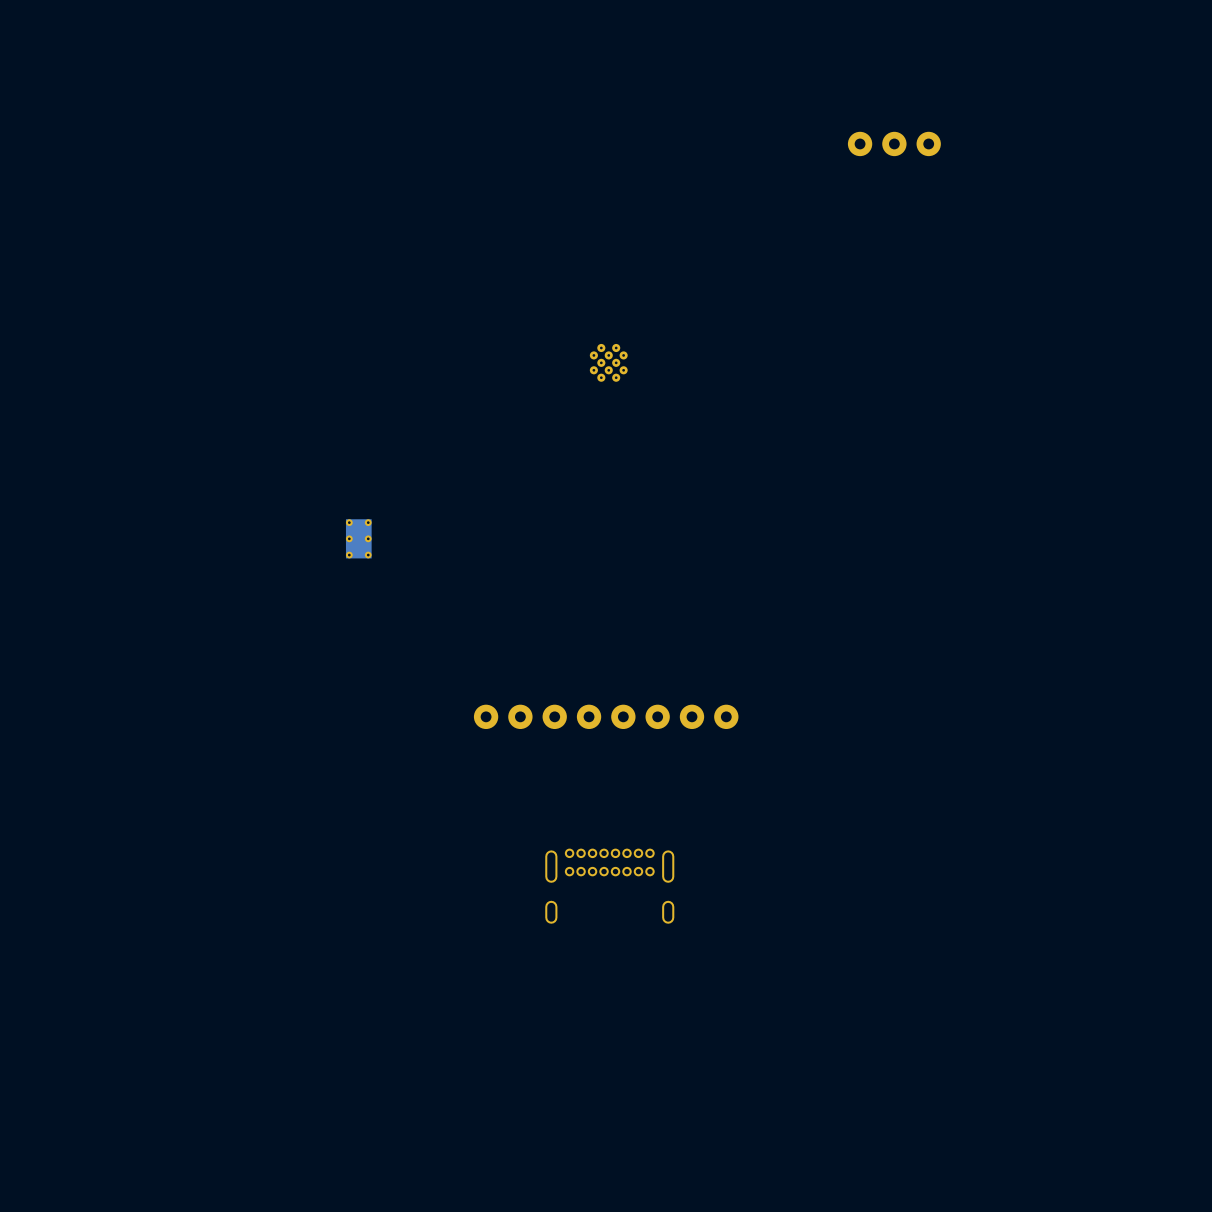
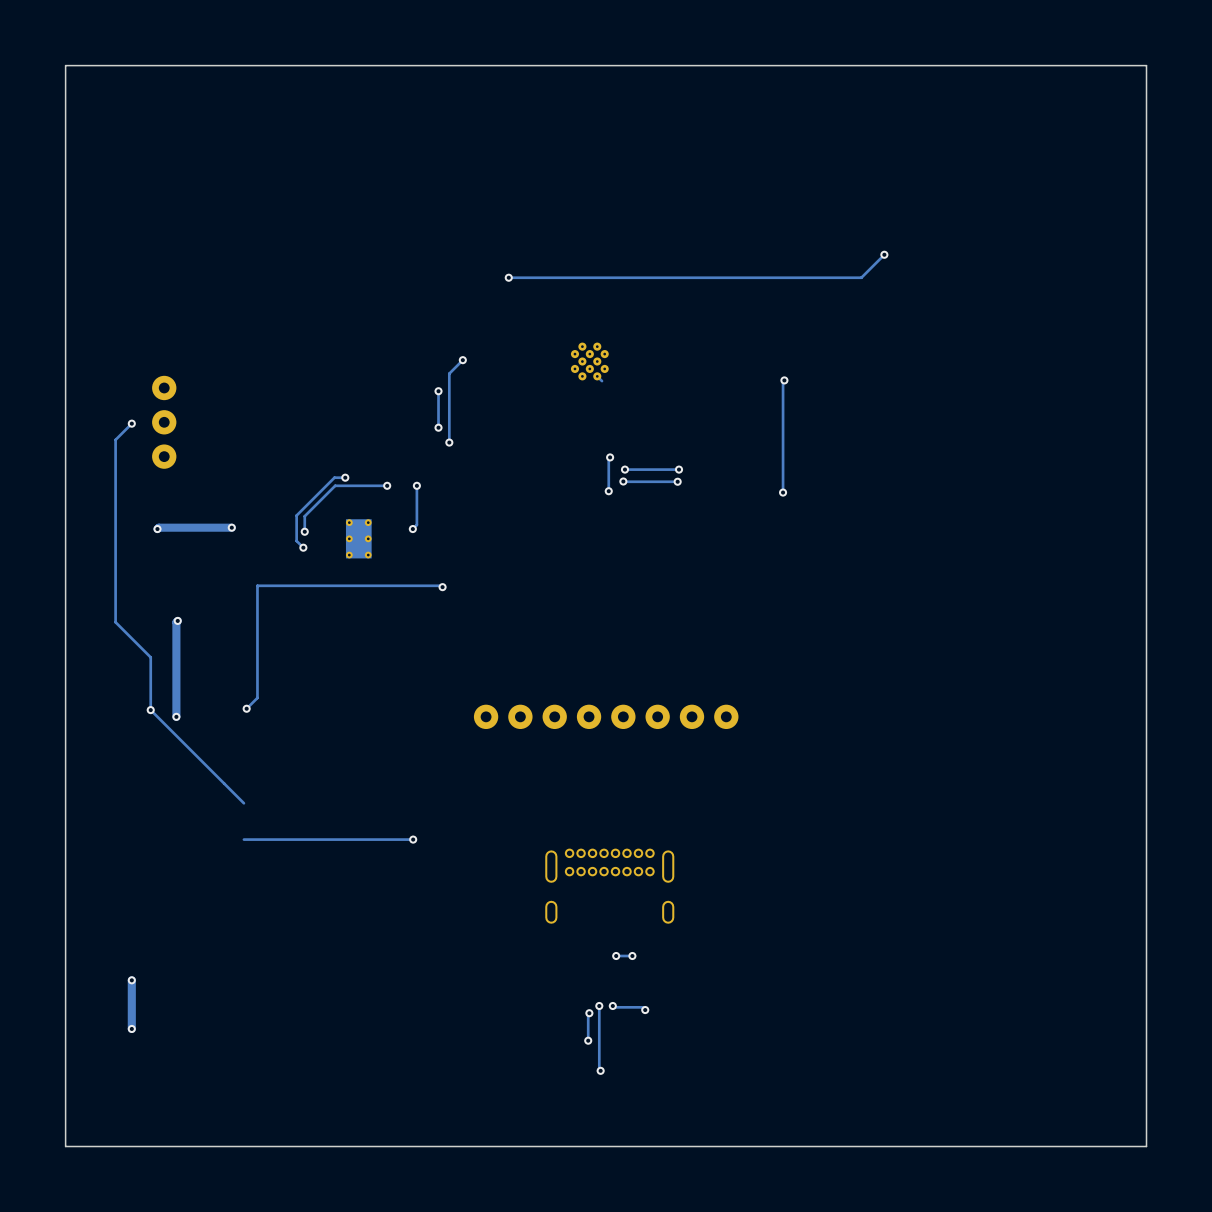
board edge: none -> (1146, 65) (65, 65) (65, 1146) (1146, 1146) (1146, 65)
part: (894, 143) -> none
track: none -> (884, 254) (861, 277) (508, 277)
via: none -> (884, 254)
via: none -> (508, 277)
track: none -> (462, 360) (449, 373) (449, 442)
via: none -> (462, 360)
part position: (608, 362) -> (589, 361)
track: none -> (597, 376) (602, 381)
track: none -> (784, 380) (783, 492)
via: none -> (784, 380)
track: none -> (438, 391) (438, 427)
via: none -> (438, 391)
part: none -> (164, 422)
track: none -> (131, 423) (115, 439) (115, 622) (150, 657) (150, 710) (243, 803)
via: none -> (131, 423)
via: none -> (438, 427)
via: none -> (449, 442)
track: none -> (610, 457) (608, 491)
via: none -> (610, 457)
via: none -> (624, 469)
track: none -> (679, 469) (624, 469)
via: none -> (679, 469)
track: none -> (345, 477) (334, 477) (296, 515) (296, 540) (303, 547)
via: none -> (345, 477)
track: none -> (623, 481) (677, 481)
via: none -> (623, 481)
via: none -> (677, 481)
track: none -> (387, 485) (335, 485) (304, 516) (304, 531)
via: none -> (387, 485)
track: none -> (416, 485) (416, 524) (412, 529)
via: none -> (416, 485)
via: none -> (608, 491)
via: none -> (783, 492)
track: none -> (231, 527) (157, 529)
via: none -> (231, 527)
via: none -> (157, 529)
via: none -> (412, 529)
via: none -> (304, 531)
via: none -> (303, 547)
track: none -> (442, 587) (257, 585) (257, 697) (246, 708)
via: none -> (442, 587)
track: none -> (177, 620) (176, 716)
via: none -> (177, 620)
via: none -> (246, 708)
via: none -> (150, 710)
via: none -> (176, 716)
track: none -> (413, 839) (243, 839)
via: none -> (413, 839)
via: none -> (616, 956)
track: none -> (632, 956) (616, 956)
via: none -> (632, 956)
track: none -> (131, 980) (131, 1028)
via: none -> (131, 980)
track: none -> (599, 1005) (600, 1070)
via: none -> (599, 1005)
track: none -> (612, 1005) (642, 1007) (645, 1010)
via: none -> (612, 1005)
via: none -> (645, 1010)
track: none -> (589, 1013) (588, 1040)
via: none -> (589, 1013)
via: none -> (131, 1028)
via: none -> (588, 1040)
via: none -> (600, 1070)

